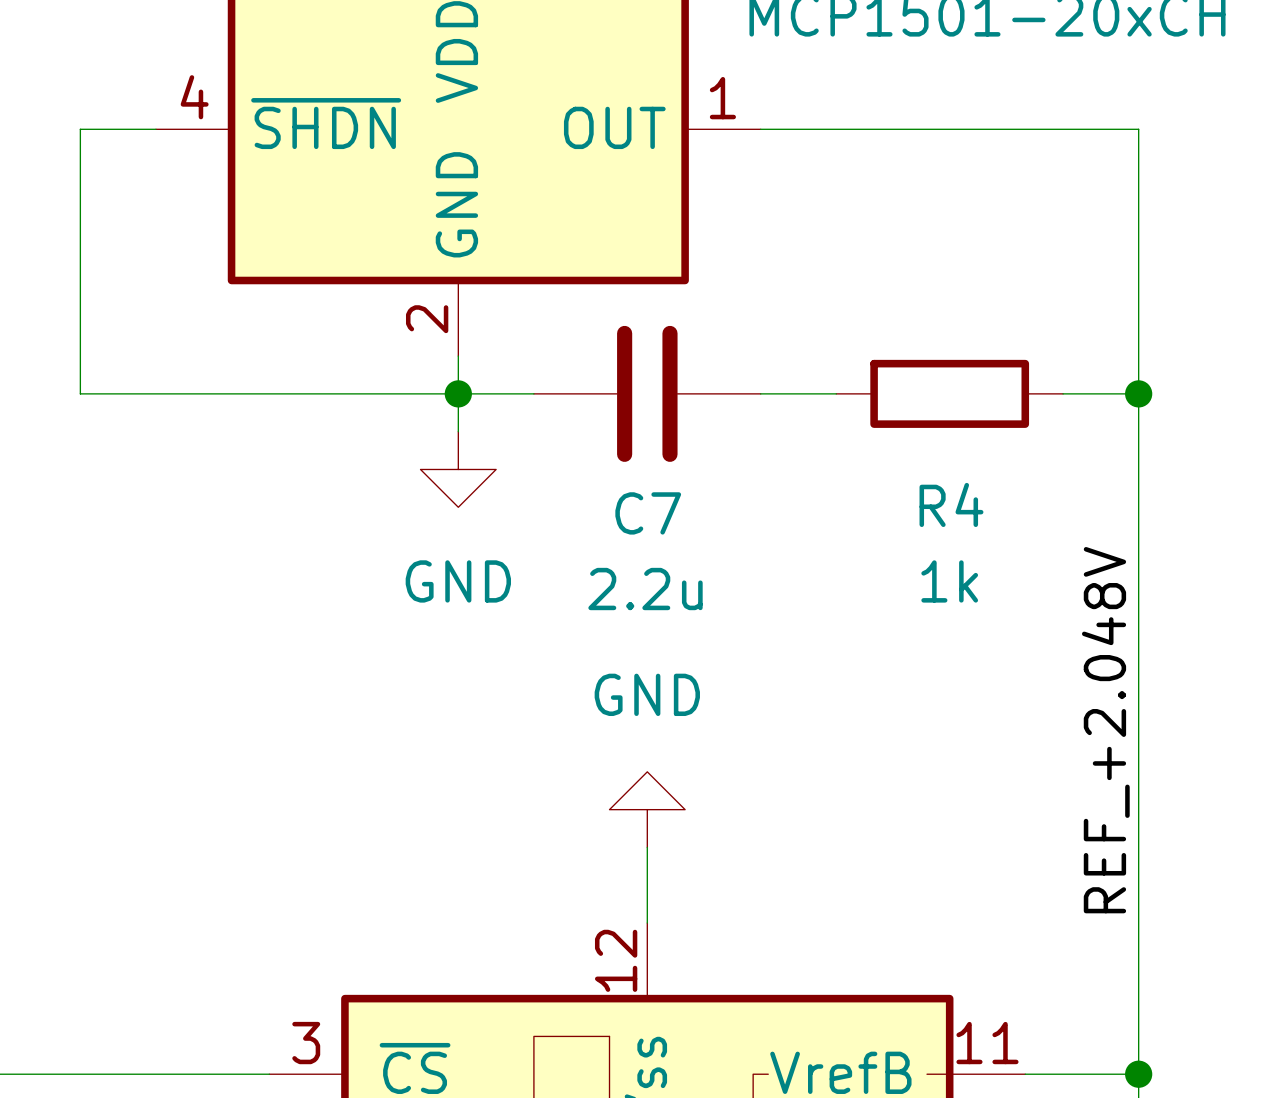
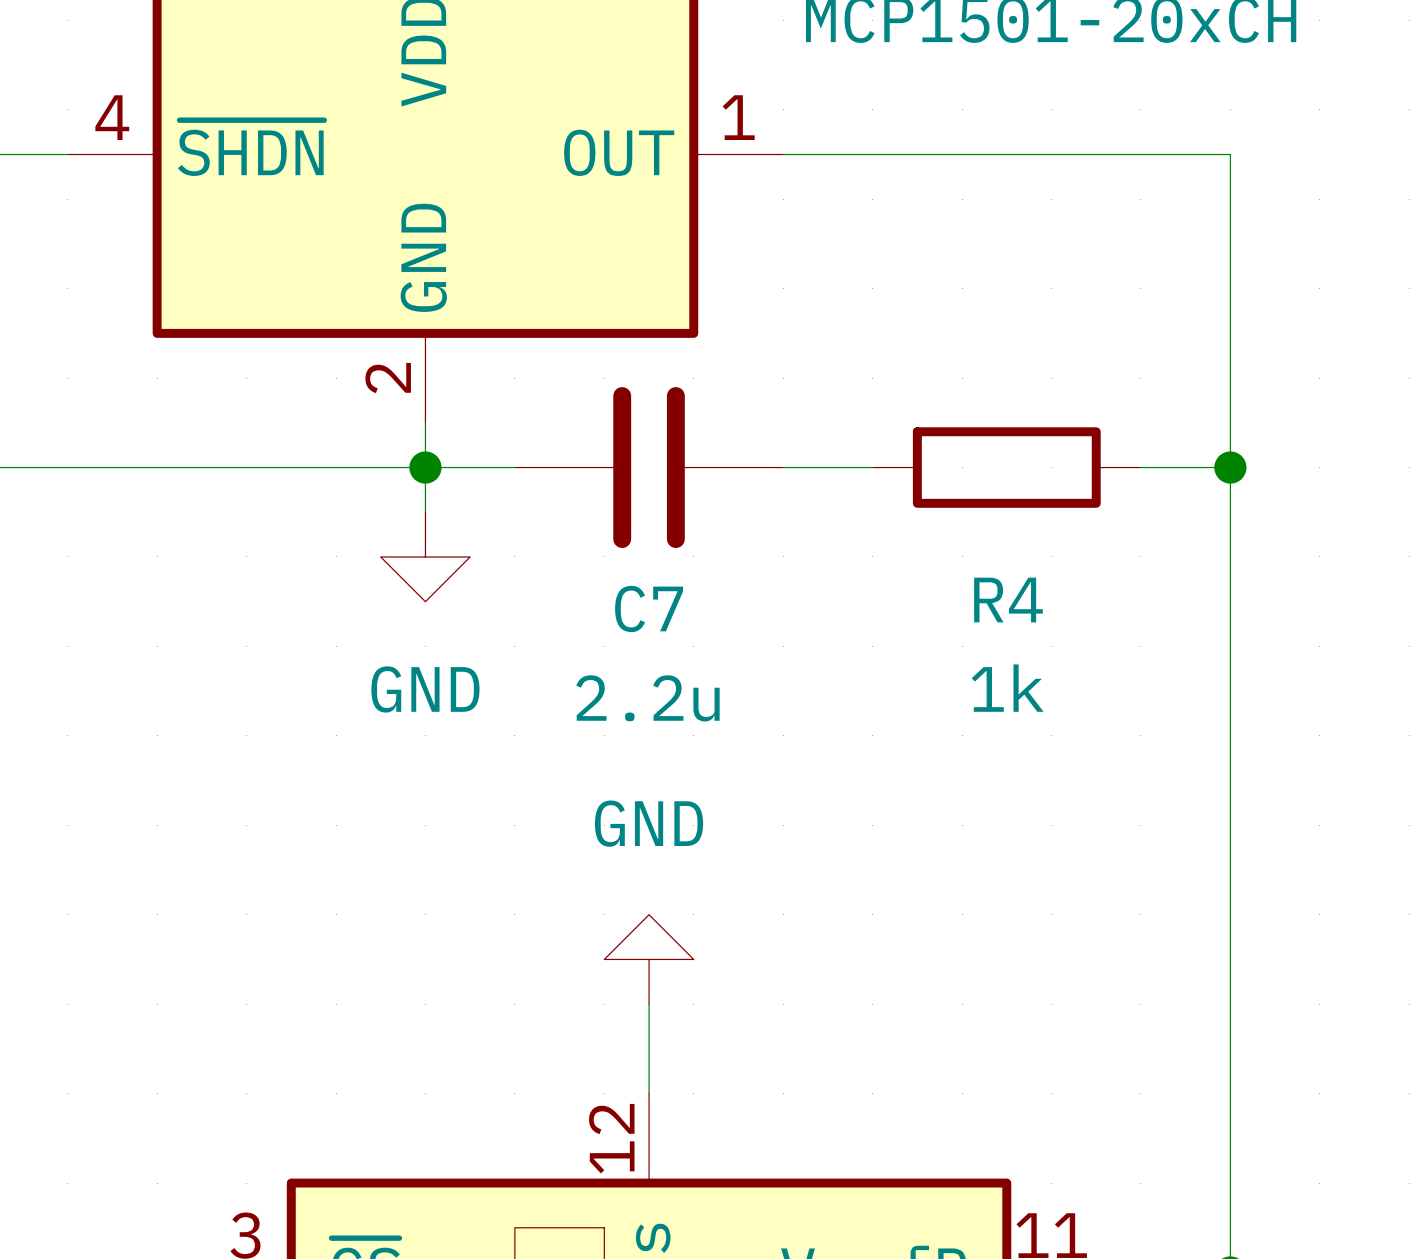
label: REF_+2.048V (1105, 730) -> none

